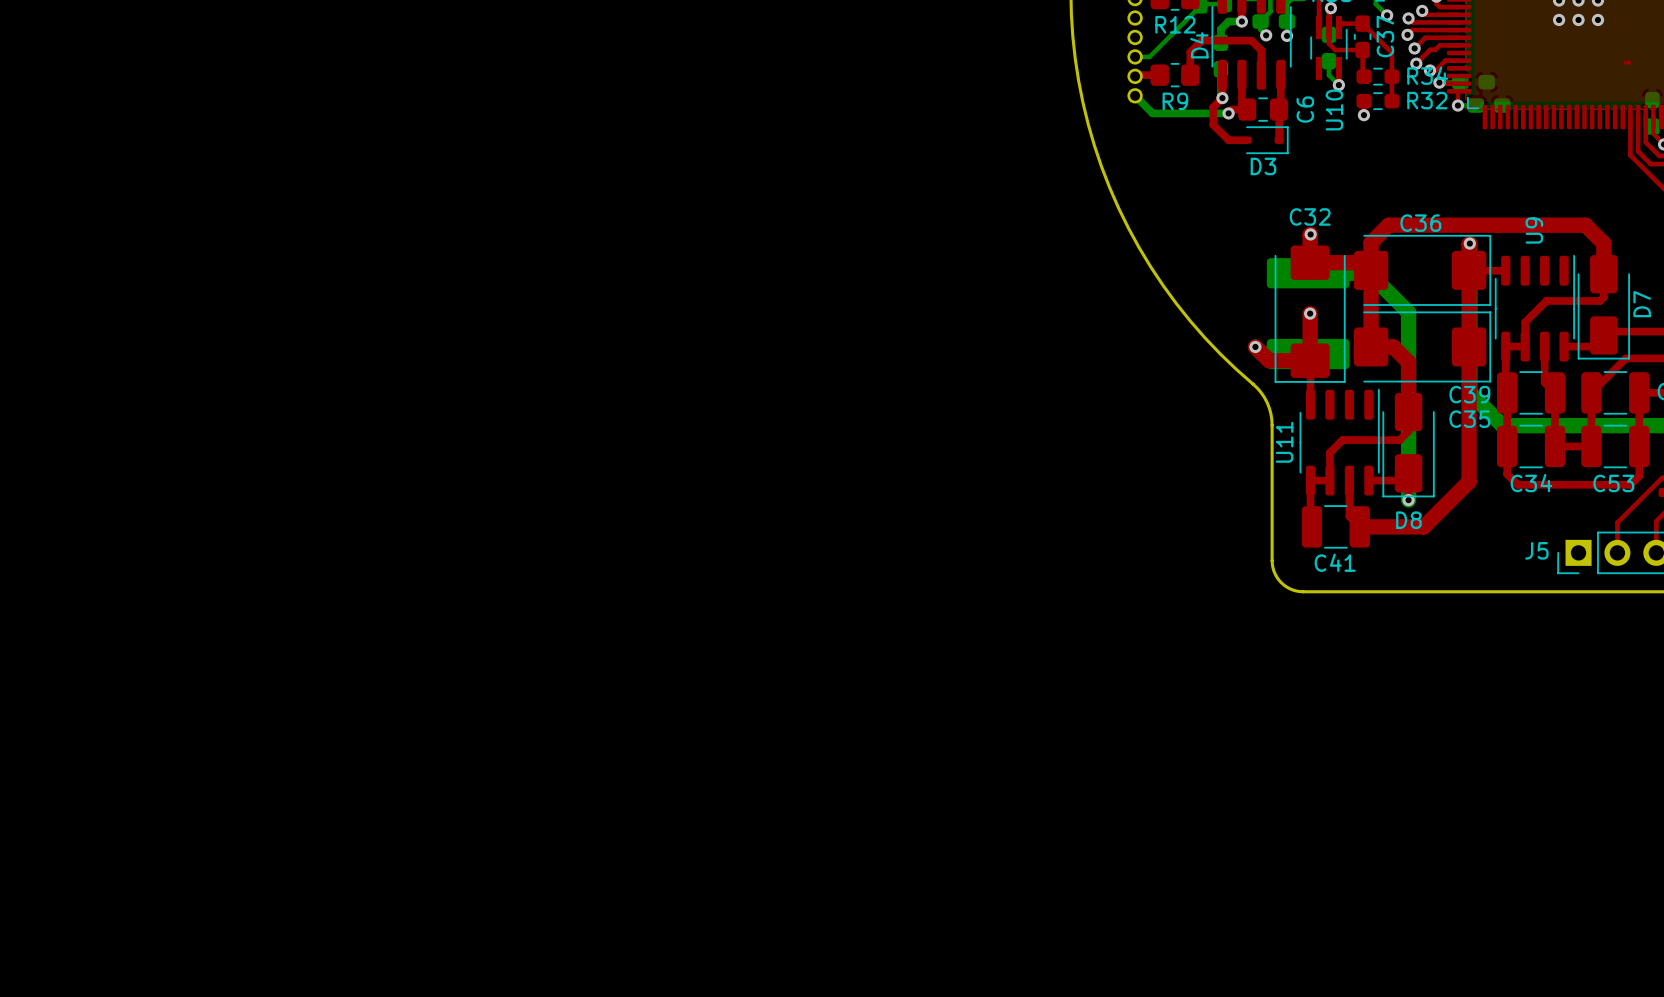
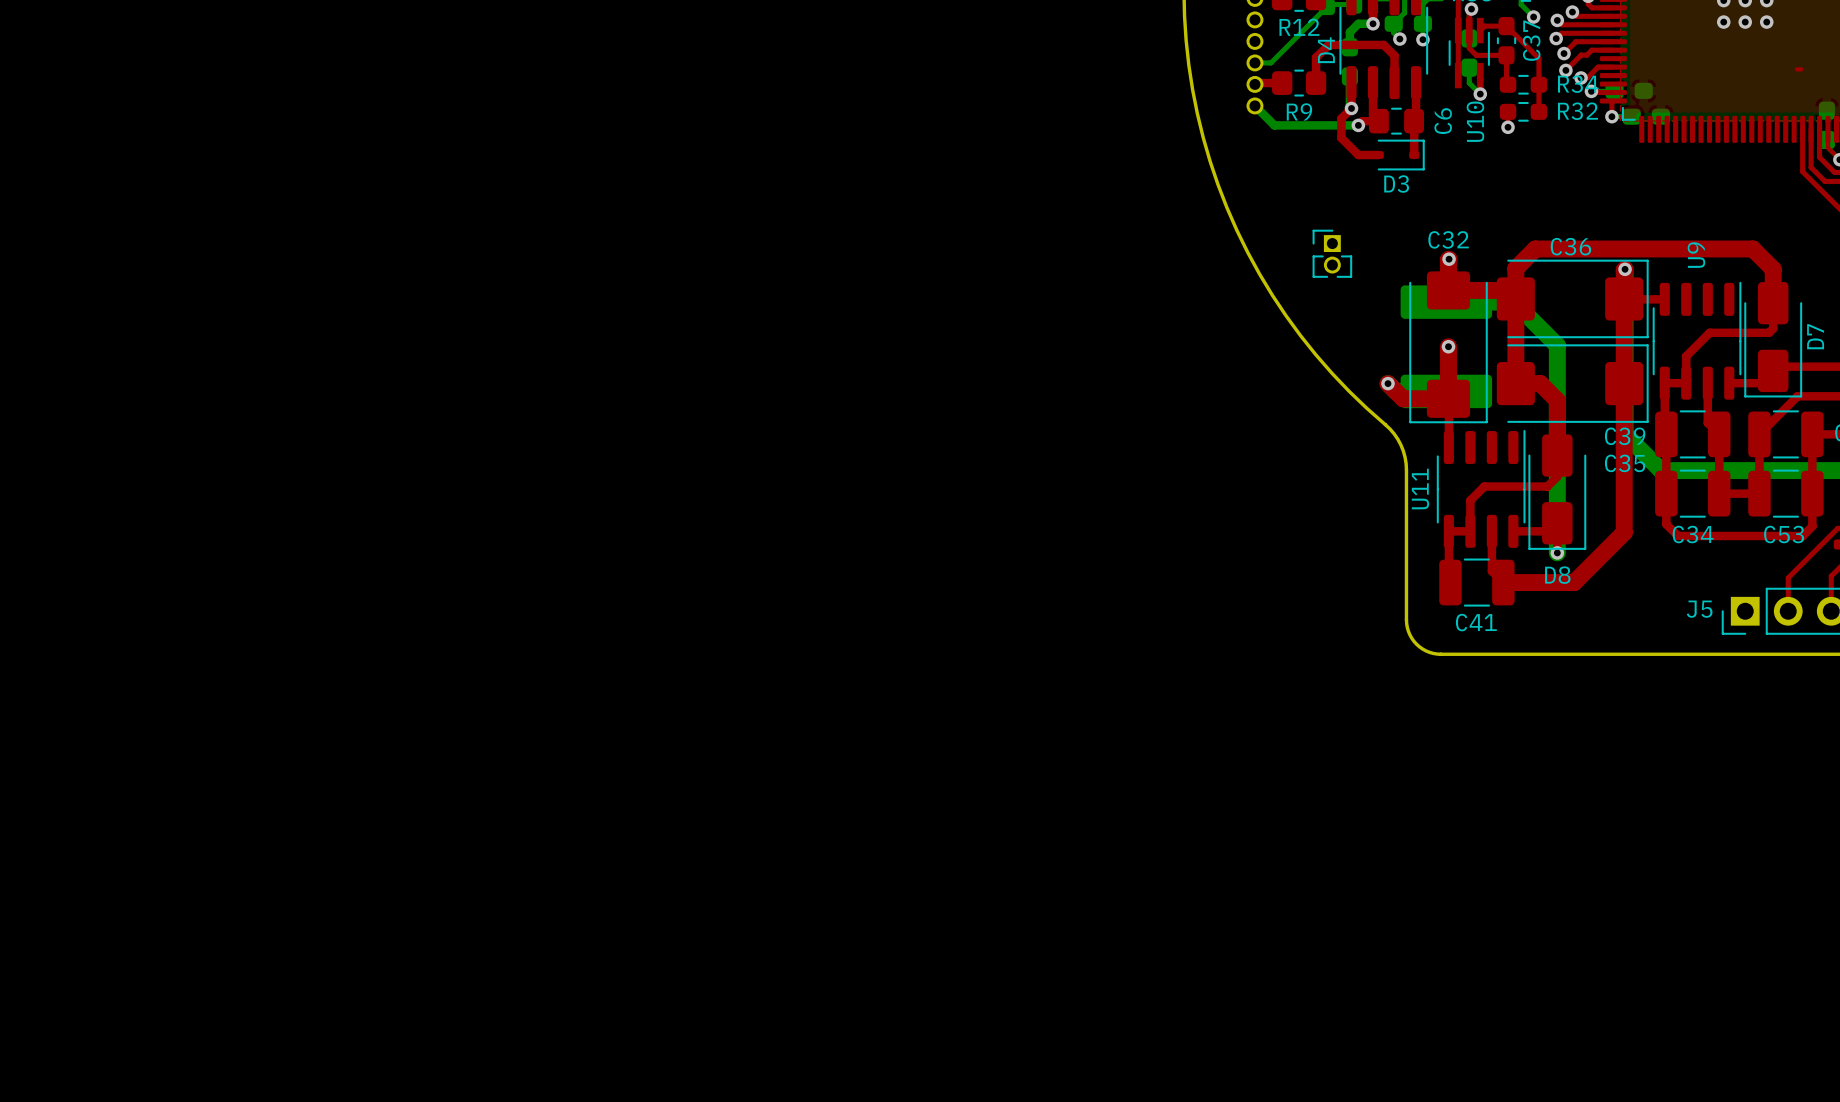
top track: none -> (1458, 30) (1458, 75)
part: none -> (1332, 253)

